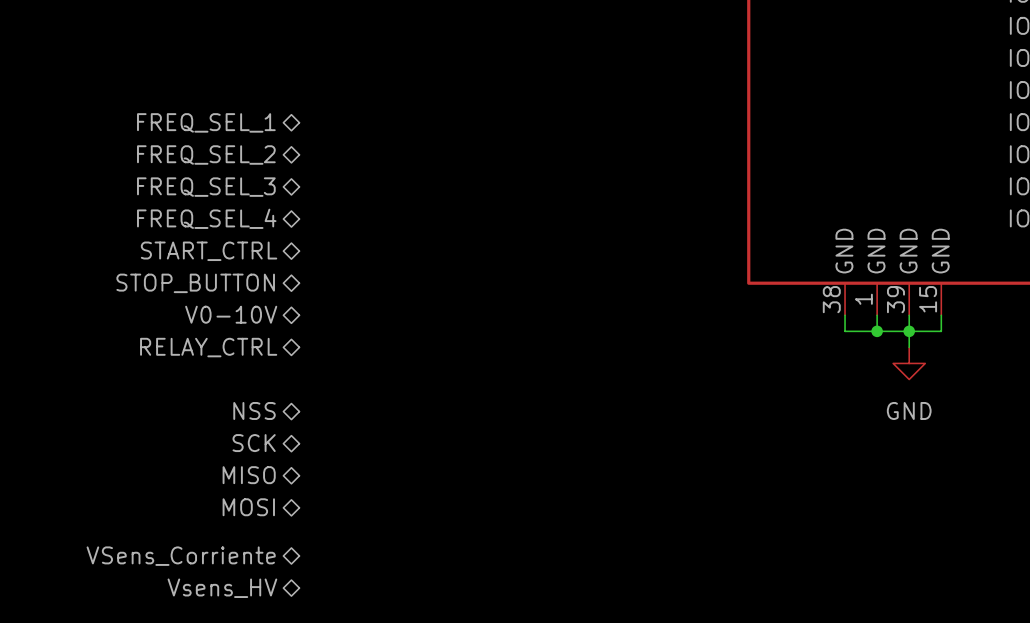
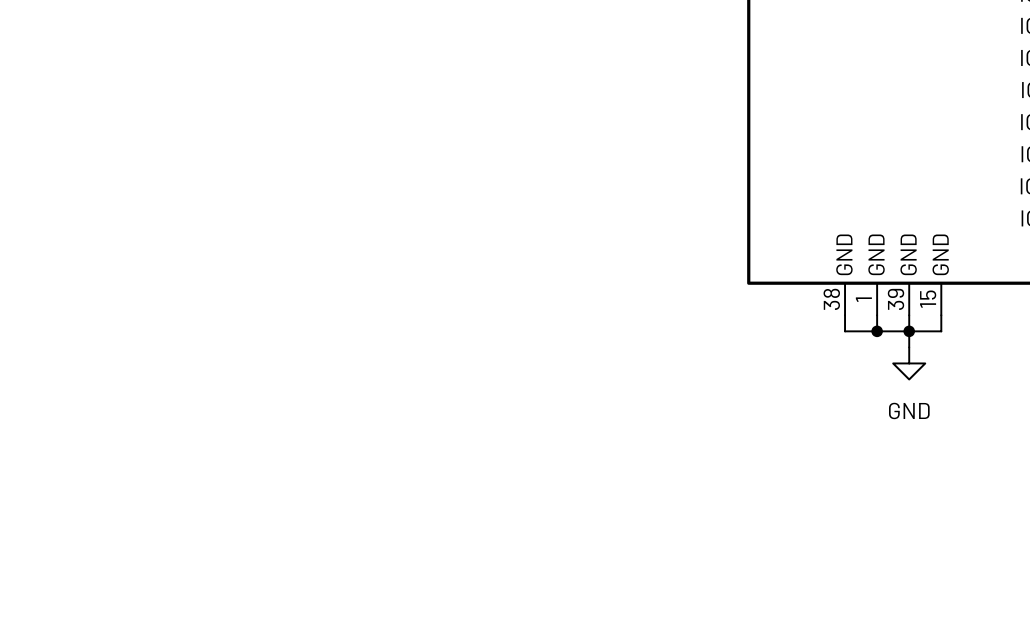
hierarchical label: FREQ_SEL_1 (206, 122) -> none
hierarchical label: FREQ_SEL_2 (206, 155) -> none
hierarchical label: FREQ_SEL_3 (206, 187) -> none
hierarchical label: FREQ_SEL_4 (206, 218) -> none
hierarchical label: START_CTRL (209, 251) -> none
hierarchical label: STOP_BUTTON (195, 283) -> none
hierarchical label: V0-10V (231, 314) -> none
hierarchical label: RELAY_CTRL (208, 347) -> none
hierarchical label: NSS (254, 410) -> none
hierarchical label: SCK (254, 443) -> none
hierarchical label: MISO (249, 475) -> none
hierarchical label: MOSI (248, 507) -> none
hierarchical label: VSens_Corriente (181, 556) -> none
hierarchical label: Vsens_HV (222, 588) -> none

